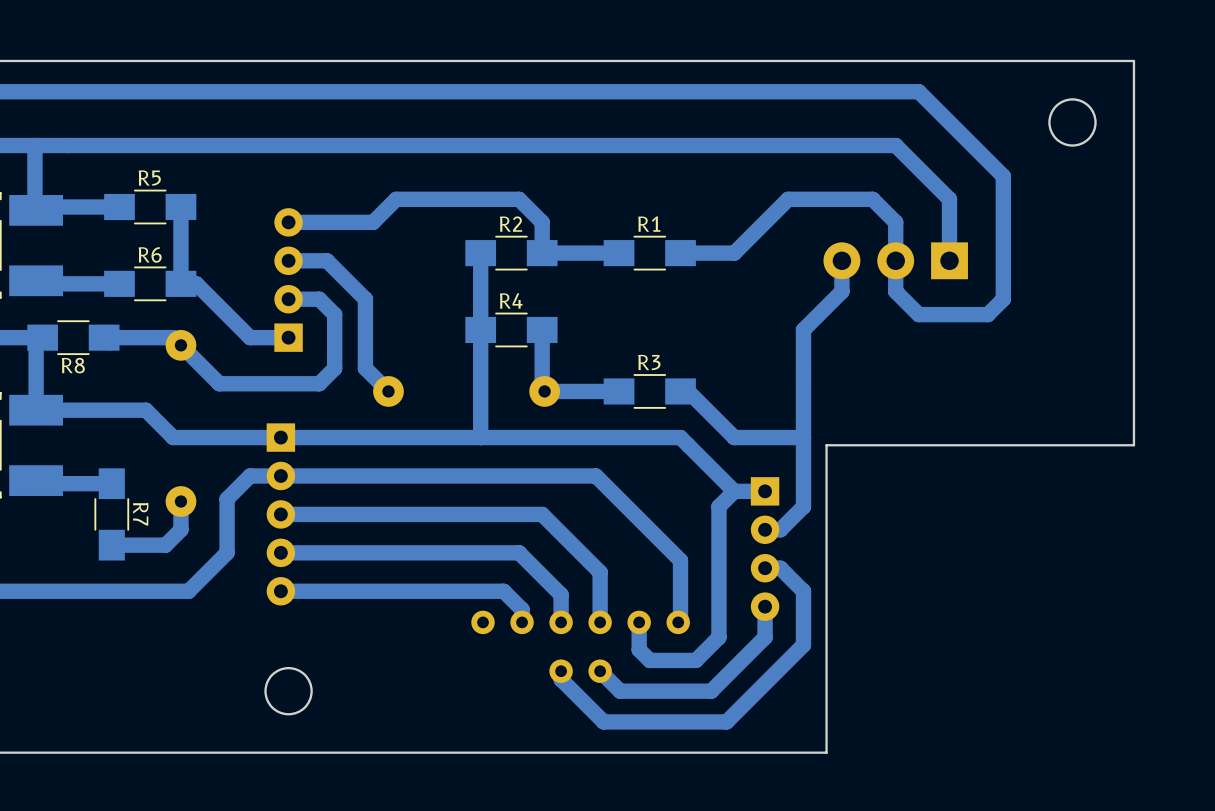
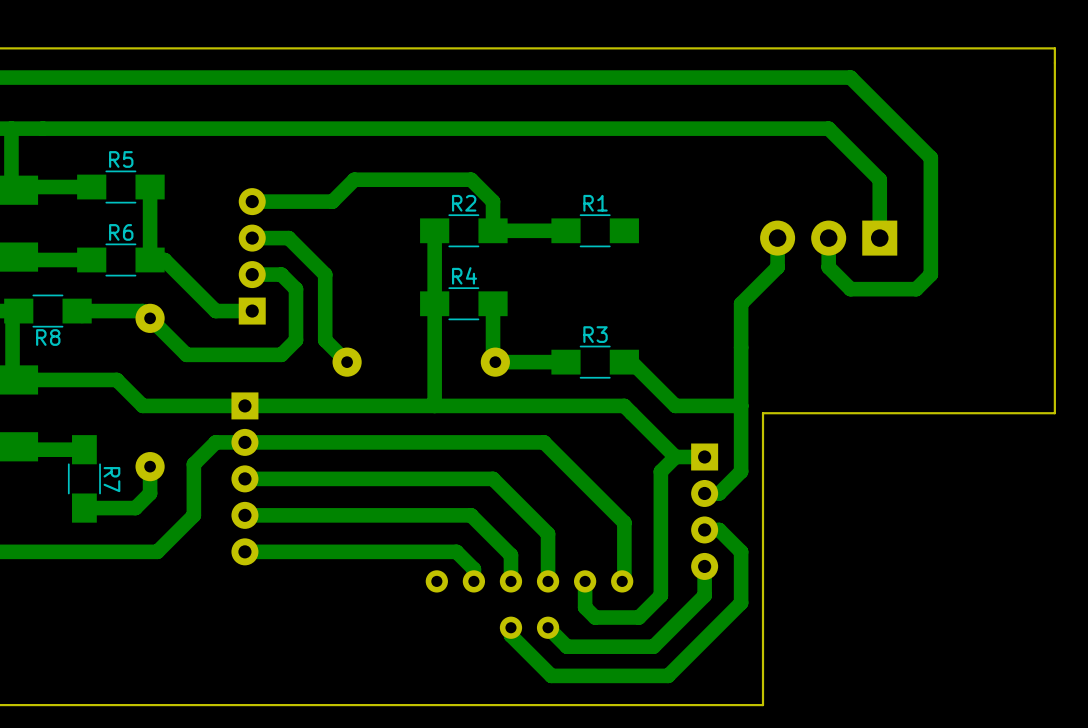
round board edge: [1048, 98, 1097, 147] -> none
bottom track: (680, 253) (734, 253) (788, 199) (872, 199) (895, 222) (895, 260) -> none
round board edge: [264, 666, 313, 716] -> none

